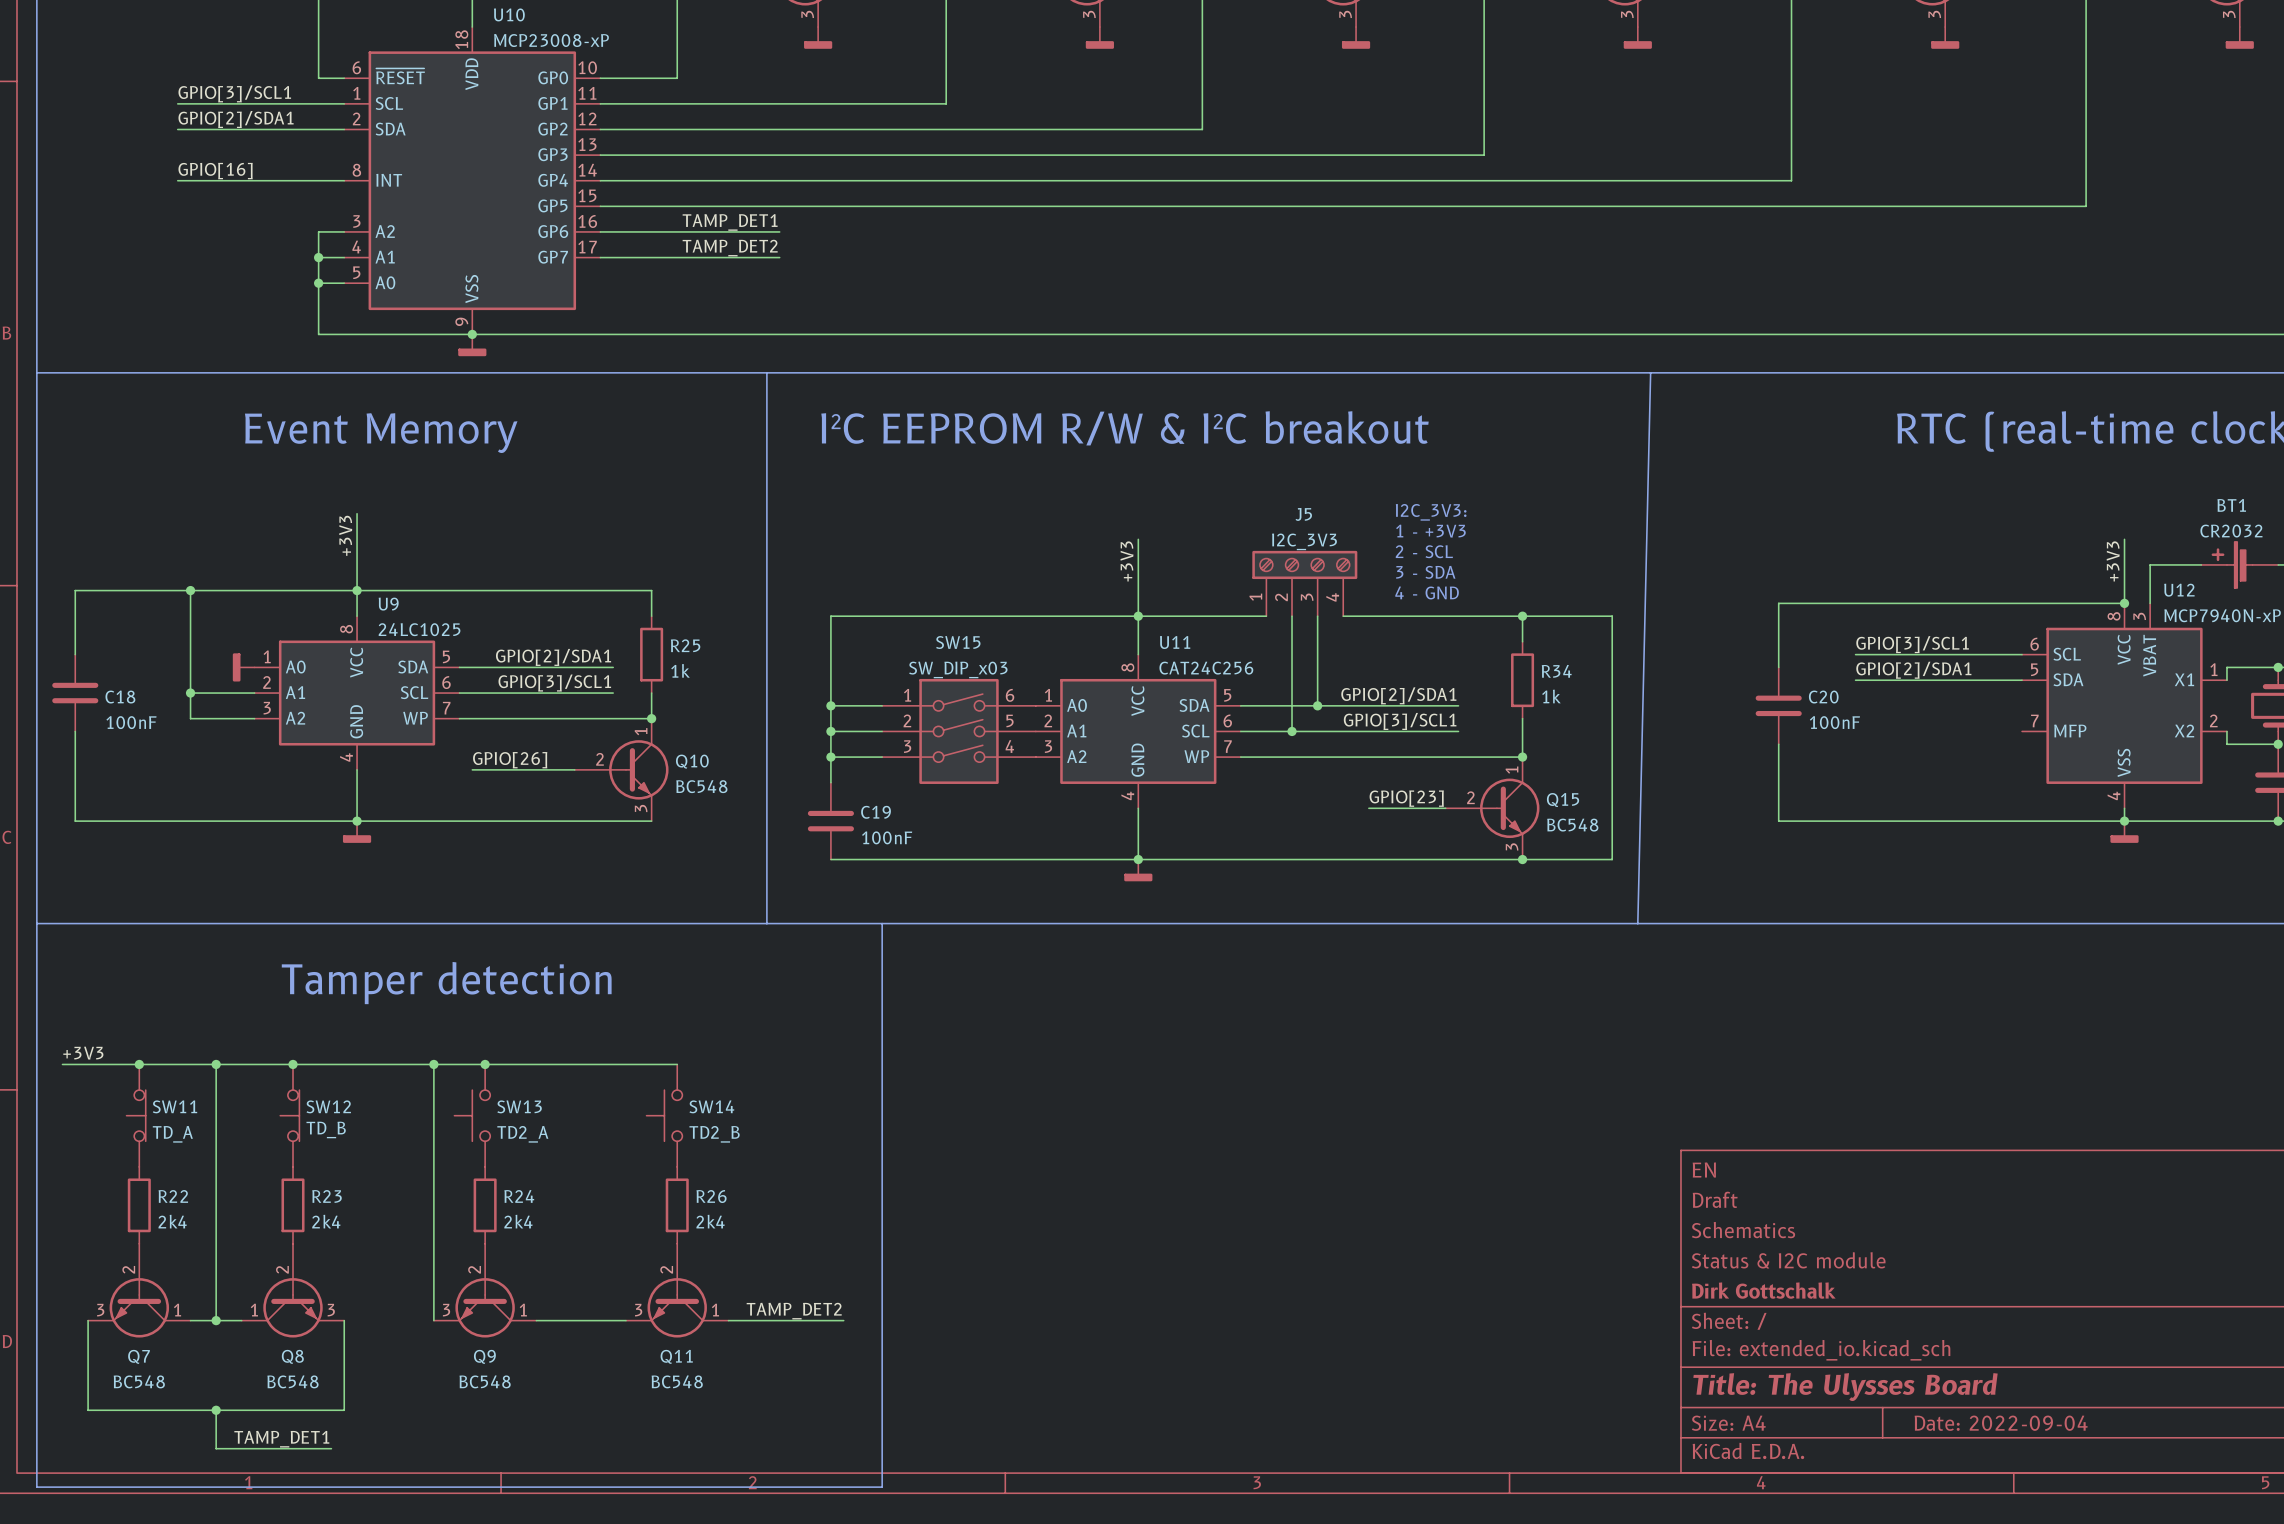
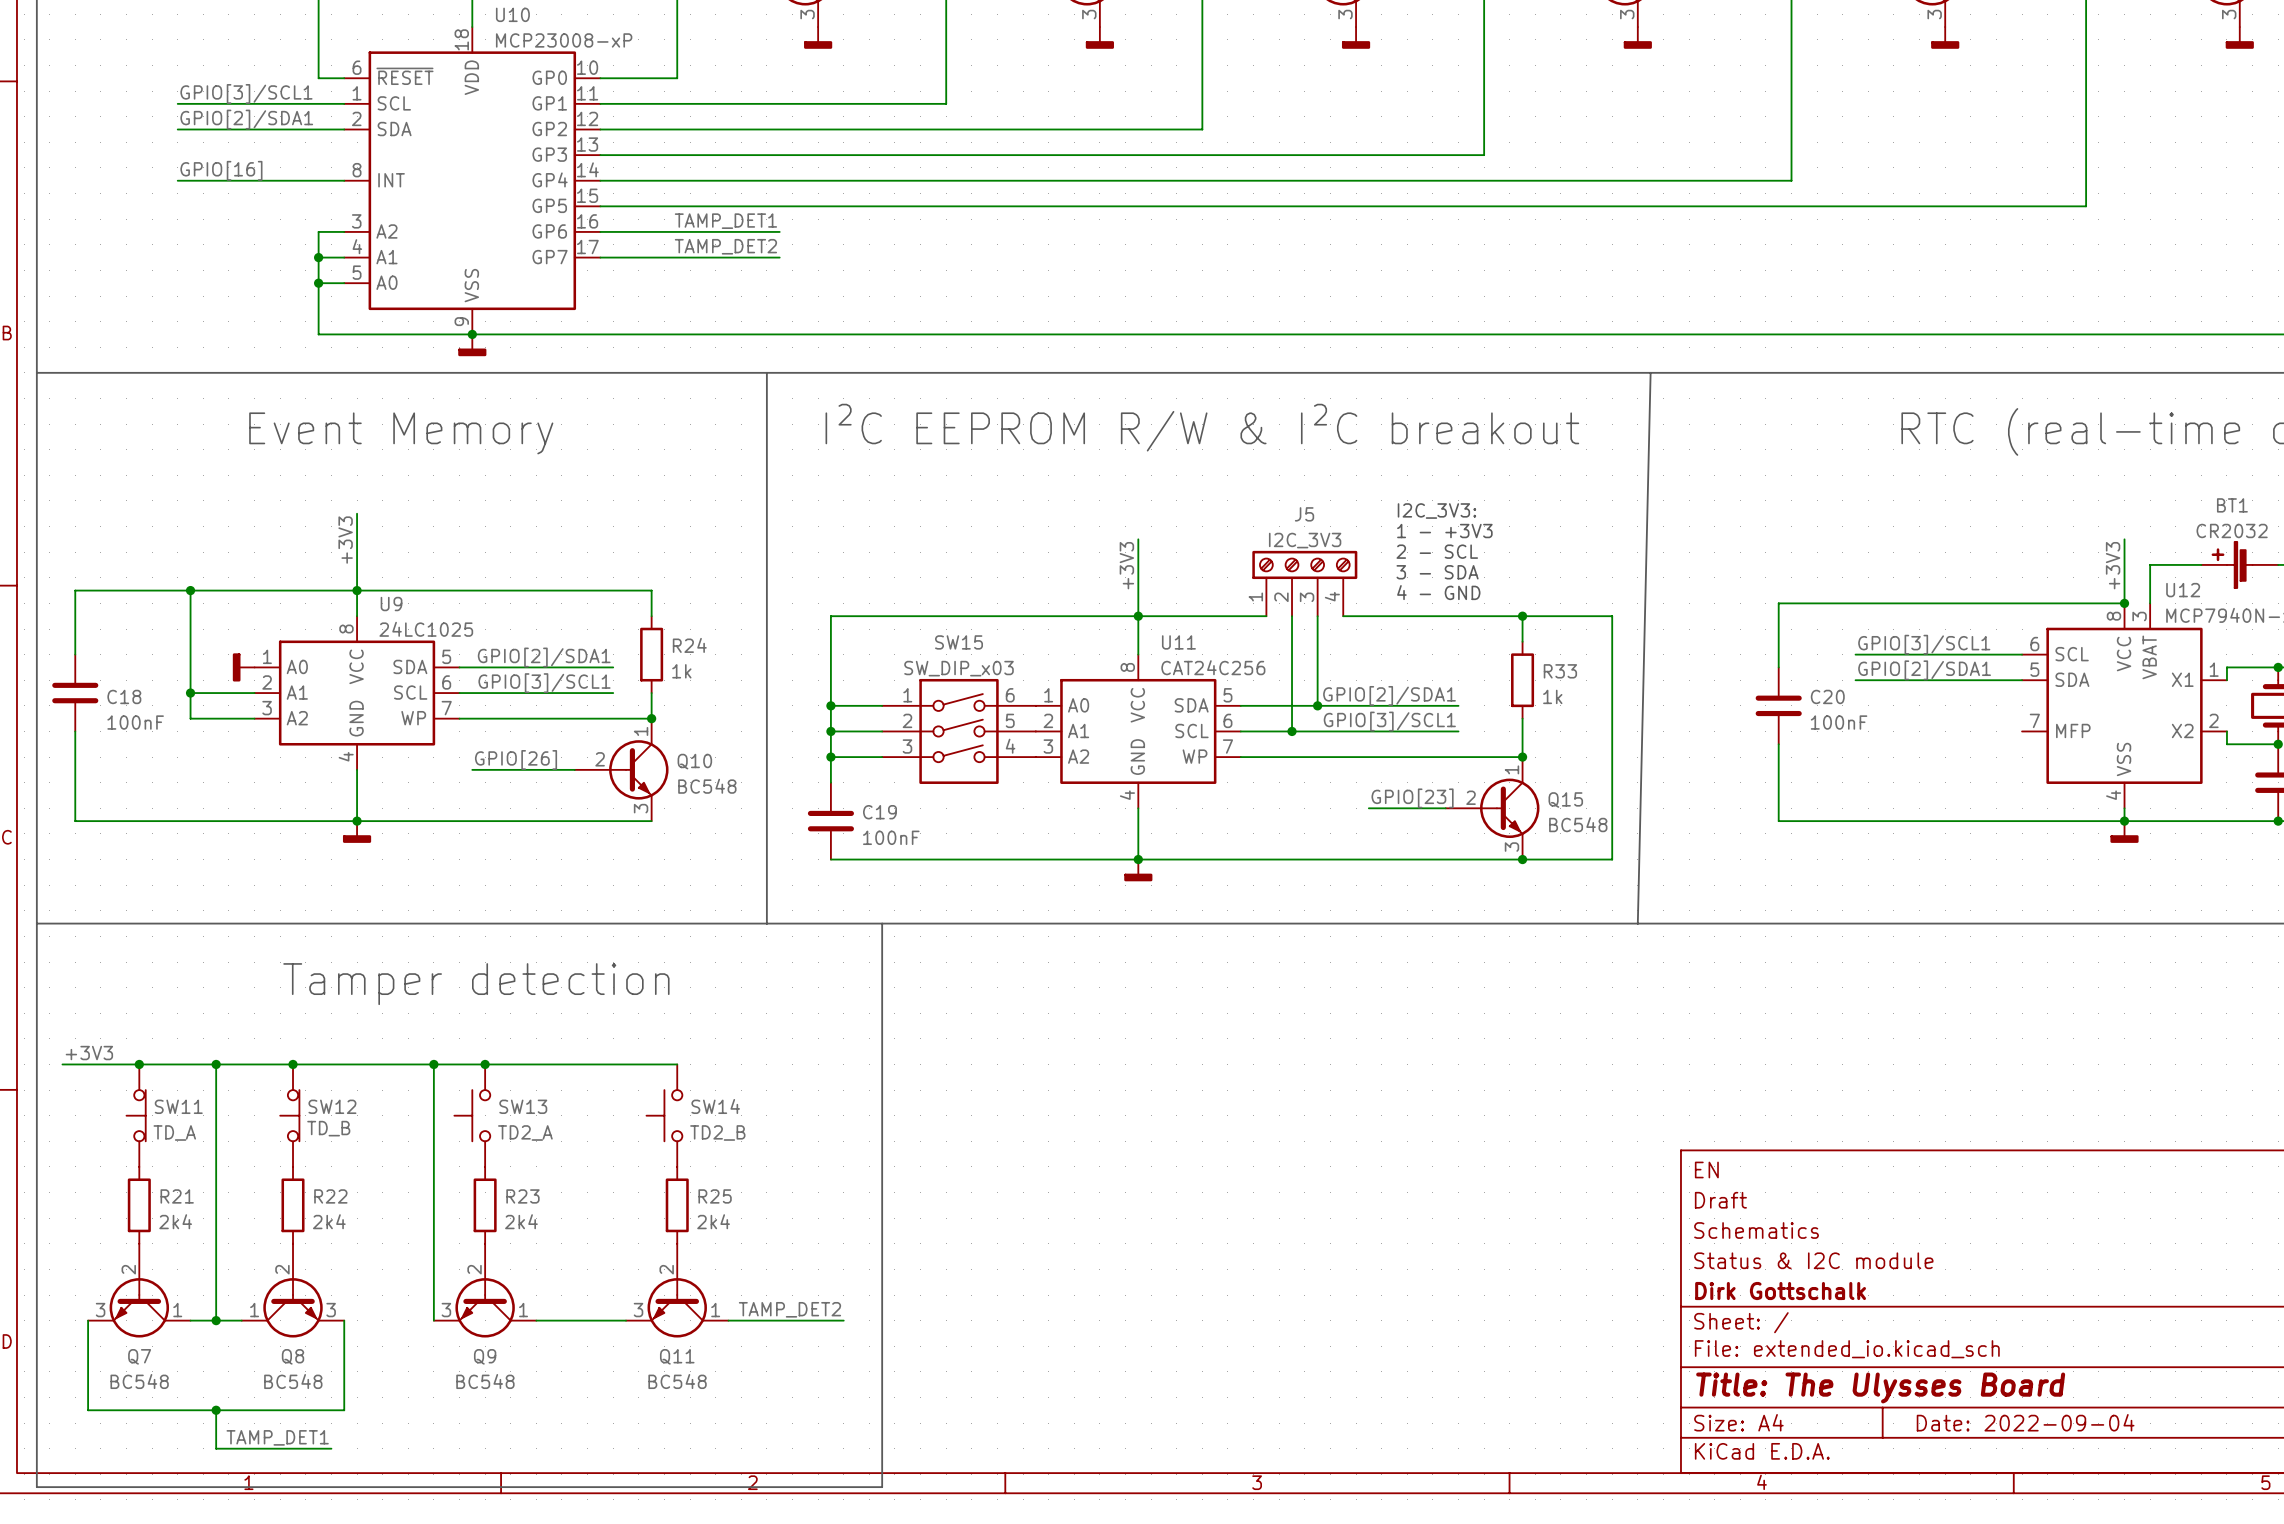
R25 name: R25 (685, 645) -> R24 (689, 645)
R34 name: R34 (1556, 671) -> R33 (1560, 671)
R22 name: R22 (173, 1196) -> R21 (177, 1196)
R23 name: R23 (327, 1196) -> R22 (330, 1196)
R24 name: R24 (519, 1196) -> R23 (522, 1196)
R26 name: R26 (711, 1196) -> R25 (715, 1196)

